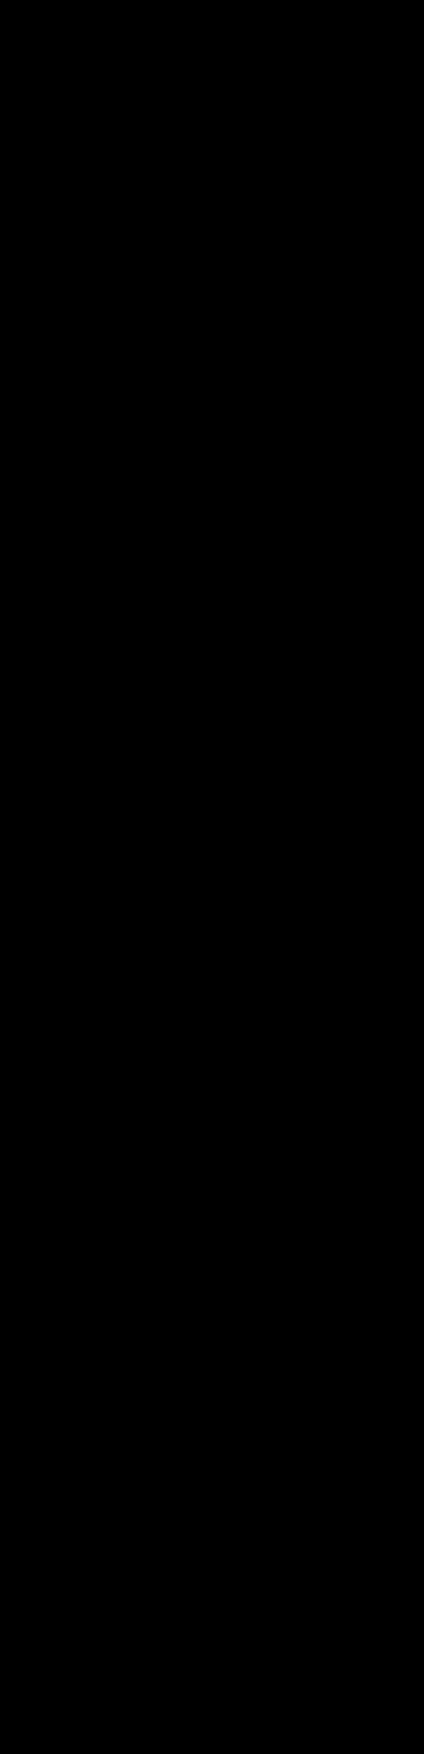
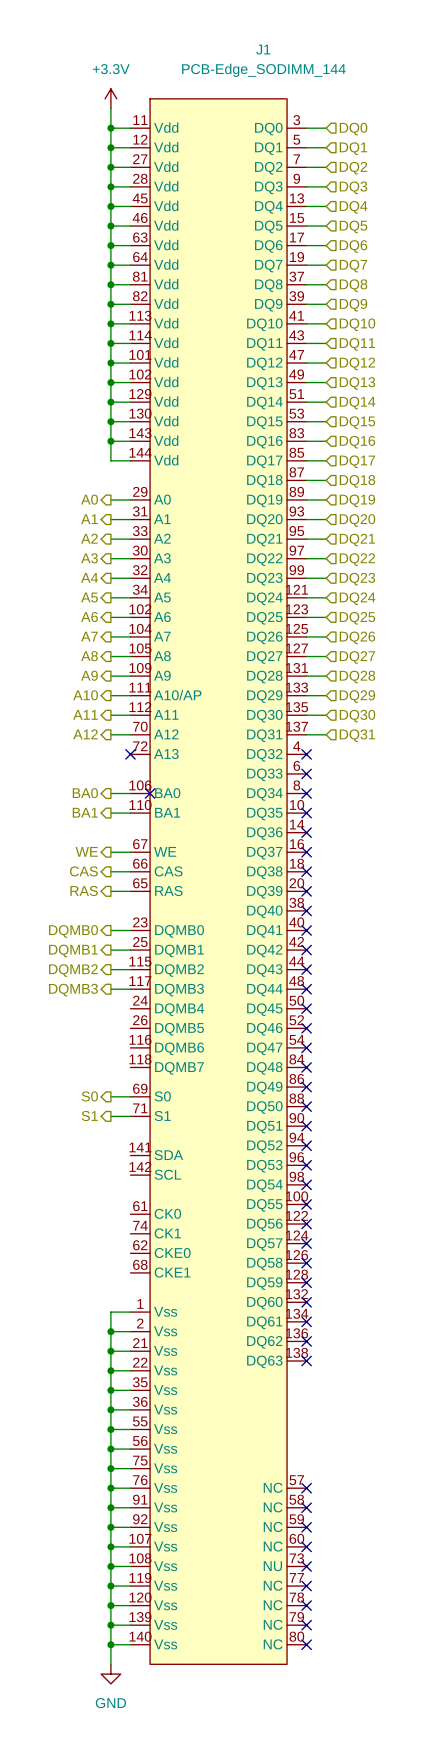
power symbol: none -> +3.3V (110, 98)
wire: none -> (110, 108) (110, 460) (130, 460)
wire: none -> (110, 128) (130, 128)
junction: none -> (110, 128)
wire: none -> (306, 128) (326, 128)
hierarchical label: none -> DQ0 (353, 129)
wire: none -> (110, 147) (130, 147)
junction: none -> (110, 147)
wire: none -> (306, 147) (326, 147)
hierarchical label: none -> DQ1 (353, 148)
wire: none -> (110, 167) (130, 167)
junction: none -> (110, 167)
wire: none -> (306, 167) (326, 167)
hierarchical label: none -> DQ2 (353, 168)
wire: none -> (110, 186) (130, 186)
junction: none -> (110, 186)
wire: none -> (306, 186) (326, 186)
hierarchical label: none -> DQ3 (353, 187)
wire: none -> (110, 206) (130, 206)
junction: none -> (110, 206)
wire: none -> (306, 206) (326, 206)
hierarchical label: none -> DQ4 (353, 207)
wire: none -> (110, 226) (130, 226)
junction: none -> (110, 226)
wire: none -> (306, 226) (326, 226)
hierarchical label: none -> DQ5 (353, 226)
wire: none -> (110, 245) (130, 245)
junction: none -> (110, 245)
wire: none -> (306, 245) (326, 245)
hierarchical label: none -> DQ6 (353, 246)
wire: none -> (110, 265) (130, 265)
junction: none -> (110, 265)
wire: none -> (306, 265) (326, 265)
hierarchical label: none -> DQ7 (353, 266)
wire: none -> (110, 284) (130, 284)
junction: none -> (110, 284)
wire: none -> (306, 284) (326, 284)
hierarchical label: none -> DQ8 (353, 285)
wire: none -> (110, 304) (130, 304)
junction: none -> (110, 304)
wire: none -> (306, 304) (326, 304)
hierarchical label: none -> DQ9 (353, 305)
wire: none -> (110, 323) (130, 323)
junction: none -> (110, 323)
wire: none -> (306, 323) (326, 323)
hierarchical label: none -> DQ10 (357, 324)
wire: none -> (110, 343) (130, 343)
junction: none -> (110, 343)
wire: none -> (306, 343) (326, 343)
hierarchical label: none -> DQ11 (357, 344)
wire: none -> (110, 363) (130, 363)
junction: none -> (110, 363)
wire: none -> (306, 363) (326, 363)
hierarchical label: none -> DQ12 (357, 363)
wire: none -> (110, 382) (130, 382)
junction: none -> (110, 382)
wire: none -> (306, 382) (326, 382)
hierarchical label: none -> DQ13 (357, 383)
wire: none -> (110, 402) (130, 402)
junction: none -> (110, 402)
wire: none -> (306, 402) (326, 402)
hierarchical label: none -> DQ14 (357, 403)
wire: none -> (110, 421) (130, 421)
junction: none -> (110, 421)
wire: none -> (306, 421) (326, 421)
hierarchical label: none -> DQ15 (357, 422)
wire: none -> (110, 441) (130, 441)
junction: none -> (110, 441)
wire: none -> (306, 441) (326, 441)
hierarchical label: none -> DQ16 (357, 442)
wire: none -> (306, 460) (326, 460)
hierarchical label: none -> DQ17 (357, 461)
wire: none -> (306, 480) (326, 480)
hierarchical label: none -> DQ18 (357, 481)
hierarchical label: none -> A0 (89, 499)
wire: none -> (110, 499) (130, 499)
wire: none -> (306, 499) (326, 499)
hierarchical label: none -> DQ19 (357, 500)
hierarchical label: none -> A1 (89, 519)
wire: none -> (110, 519) (130, 519)
wire: none -> (306, 519) (326, 519)
hierarchical label: none -> DQ20 (357, 520)
hierarchical label: none -> A2 (89, 538)
wire: none -> (110, 539) (130, 539)
wire: none -> (306, 539) (326, 539)
hierarchical label: none -> DQ21 (357, 540)
hierarchical label: none -> A3 (89, 558)
wire: none -> (110, 558) (130, 558)
wire: none -> (306, 558) (326, 558)
hierarchical label: none -> DQ22 (357, 559)
hierarchical label: none -> A4 (89, 577)
wire: none -> (110, 578) (130, 578)
wire: none -> (306, 578) (326, 578)
hierarchical label: none -> DQ23 (357, 579)
hierarchical label: none -> A5 (89, 597)
wire: none -> (110, 597) (130, 597)
wire: none -> (306, 597) (326, 597)
hierarchical label: none -> DQ24 (357, 598)
hierarchical label: none -> A6 (89, 617)
wire: none -> (110, 617) (130, 617)
wire: none -> (306, 617) (326, 617)
hierarchical label: none -> DQ25 (357, 618)
hierarchical label: none -> A7 (89, 636)
wire: none -> (110, 636) (130, 636)
wire: none -> (306, 636) (326, 636)
hierarchical label: none -> DQ26 (357, 637)
hierarchical label: none -> A8 (89, 656)
wire: none -> (110, 656) (130, 656)
wire: none -> (306, 656) (326, 656)
hierarchical label: none -> DQ27 (357, 657)
hierarchical label: none -> A9 (89, 675)
wire: none -> (110, 676) (130, 676)
wire: none -> (306, 676) (326, 676)
hierarchical label: none -> DQ28 (357, 677)
hierarchical label: none -> A10 (85, 695)
wire: none -> (110, 695) (130, 695)
wire: none -> (306, 695) (326, 695)
hierarchical label: none -> DQ29 (357, 696)
hierarchical label: none -> A11 (85, 714)
wire: none -> (110, 715) (130, 715)
wire: none -> (306, 715) (326, 715)
hierarchical label: none -> DQ30 (357, 716)
hierarchical label: none -> A12 (85, 734)
wire: none -> (110, 734) (130, 734)
wire: none -> (306, 734) (326, 734)
hierarchical label: none -> DQ31 (357, 735)
no-connect mark: none -> (130, 754)
no-connect mark: none -> (306, 754)
no-connect mark: none -> (306, 773)
hierarchical label: none -> BA0 (85, 793)
wire: none -> (110, 793) (130, 793)
no-connect mark: none -> (150, 793)
no-connect mark: none -> (306, 793)
hierarchical label: none -> BA1 (85, 812)
wire: none -> (110, 813) (130, 813)
no-connect mark: none -> (306, 813)
no-connect mark: none -> (306, 832)
hierarchical label: none -> WE (86, 851)
wire: none -> (110, 852) (130, 852)
no-connect mark: none -> (306, 852)
hierarchical label: none -> CAS (83, 871)
wire: none -> (110, 871) (130, 871)
no-connect mark: none -> (306, 871)
J1: none -> PCB-Edge_SODIMM_144 (218, 881)
hierarchical label: none -> RAS (84, 890)
wire: none -> (110, 891) (130, 891)
no-connect mark: none -> (306, 891)
no-connect mark: none -> (306, 910)
wire: none -> (110, 930) (130, 930)
no-connect mark: none -> (306, 930)
hierarchical label: none -> DQMB0 (73, 931)
hierarchical label: none -> DQMB1 (73, 950)
wire: none -> (110, 950) (130, 950)
no-connect mark: none -> (306, 950)
wire: none -> (110, 969) (130, 969)
no-connect mark: none -> (306, 969)
hierarchical label: none -> DQMB2 (73, 970)
wire: none -> (110, 989) (130, 989)
no-connect mark: none -> (306, 989)
hierarchical label: none -> DQMB3 (73, 990)
no-connect mark: none -> (306, 1008)
no-connect mark: none -> (306, 1028)
no-connect mark: none -> (306, 1047)
no-connect mark: none -> (306, 1067)
no-connect mark: none -> (306, 1087)
hierarchical label: none -> S0 (89, 1096)
wire: none -> (110, 1096) (130, 1096)
no-connect mark: none -> (306, 1106)
hierarchical label: none -> S1 (89, 1116)
wire: none -> (110, 1116) (130, 1116)
no-connect mark: none -> (306, 1126)
no-connect mark: none -> (306, 1145)
no-connect mark: none -> (306, 1165)
no-connect mark: none -> (306, 1184)
no-connect mark: none -> (306, 1204)
no-connect mark: none -> (306, 1224)
no-connect mark: none -> (306, 1243)
no-connect mark: none -> (306, 1263)
no-connect mark: none -> (306, 1282)
no-connect mark: none -> (306, 1302)
wire: none -> (130, 1312) (110, 1312) (110, 1664)
no-connect mark: none -> (306, 1321)
wire: none -> (110, 1331) (130, 1331)
junction: none -> (110, 1331)
no-connect mark: none -> (306, 1341)
wire: none -> (110, 1351) (130, 1351)
junction: none -> (110, 1351)
no-connect mark: none -> (306, 1361)
wire: none -> (110, 1370) (130, 1370)
junction: none -> (110, 1370)
wire: none -> (110, 1390) (130, 1390)
junction: none -> (110, 1390)
wire: none -> (110, 1409) (130, 1409)
junction: none -> (110, 1409)
wire: none -> (110, 1429) (130, 1429)
junction: none -> (110, 1429)
wire: none -> (110, 1449) (130, 1449)
junction: none -> (110, 1449)
wire: none -> (110, 1468) (130, 1468)
junction: none -> (110, 1468)
wire: none -> (110, 1488) (130, 1488)
junction: none -> (110, 1488)
no-connect mark: none -> (306, 1488)
wire: none -> (110, 1507) (130, 1507)
junction: none -> (110, 1507)
no-connect mark: none -> (306, 1507)
wire: none -> (110, 1527) (130, 1527)
junction: none -> (110, 1527)
no-connect mark: none -> (306, 1527)
wire: none -> (110, 1546) (130, 1546)
junction: none -> (110, 1546)
no-connect mark: none -> (306, 1546)
wire: none -> (110, 1566) (130, 1566)
junction: none -> (110, 1566)
no-connect mark: none -> (306, 1566)
wire: none -> (110, 1586) (130, 1586)
junction: none -> (110, 1586)
no-connect mark: none -> (306, 1586)
wire: none -> (110, 1605) (130, 1605)
junction: none -> (110, 1605)
no-connect mark: none -> (306, 1605)
wire: none -> (110, 1625) (130, 1625)
junction: none -> (110, 1625)
no-connect mark: none -> (306, 1625)
wire: none -> (110, 1644) (130, 1644)
junction: none -> (110, 1644)
no-connect mark: none -> (306, 1644)
power symbol: none -> GND (110, 1674)

